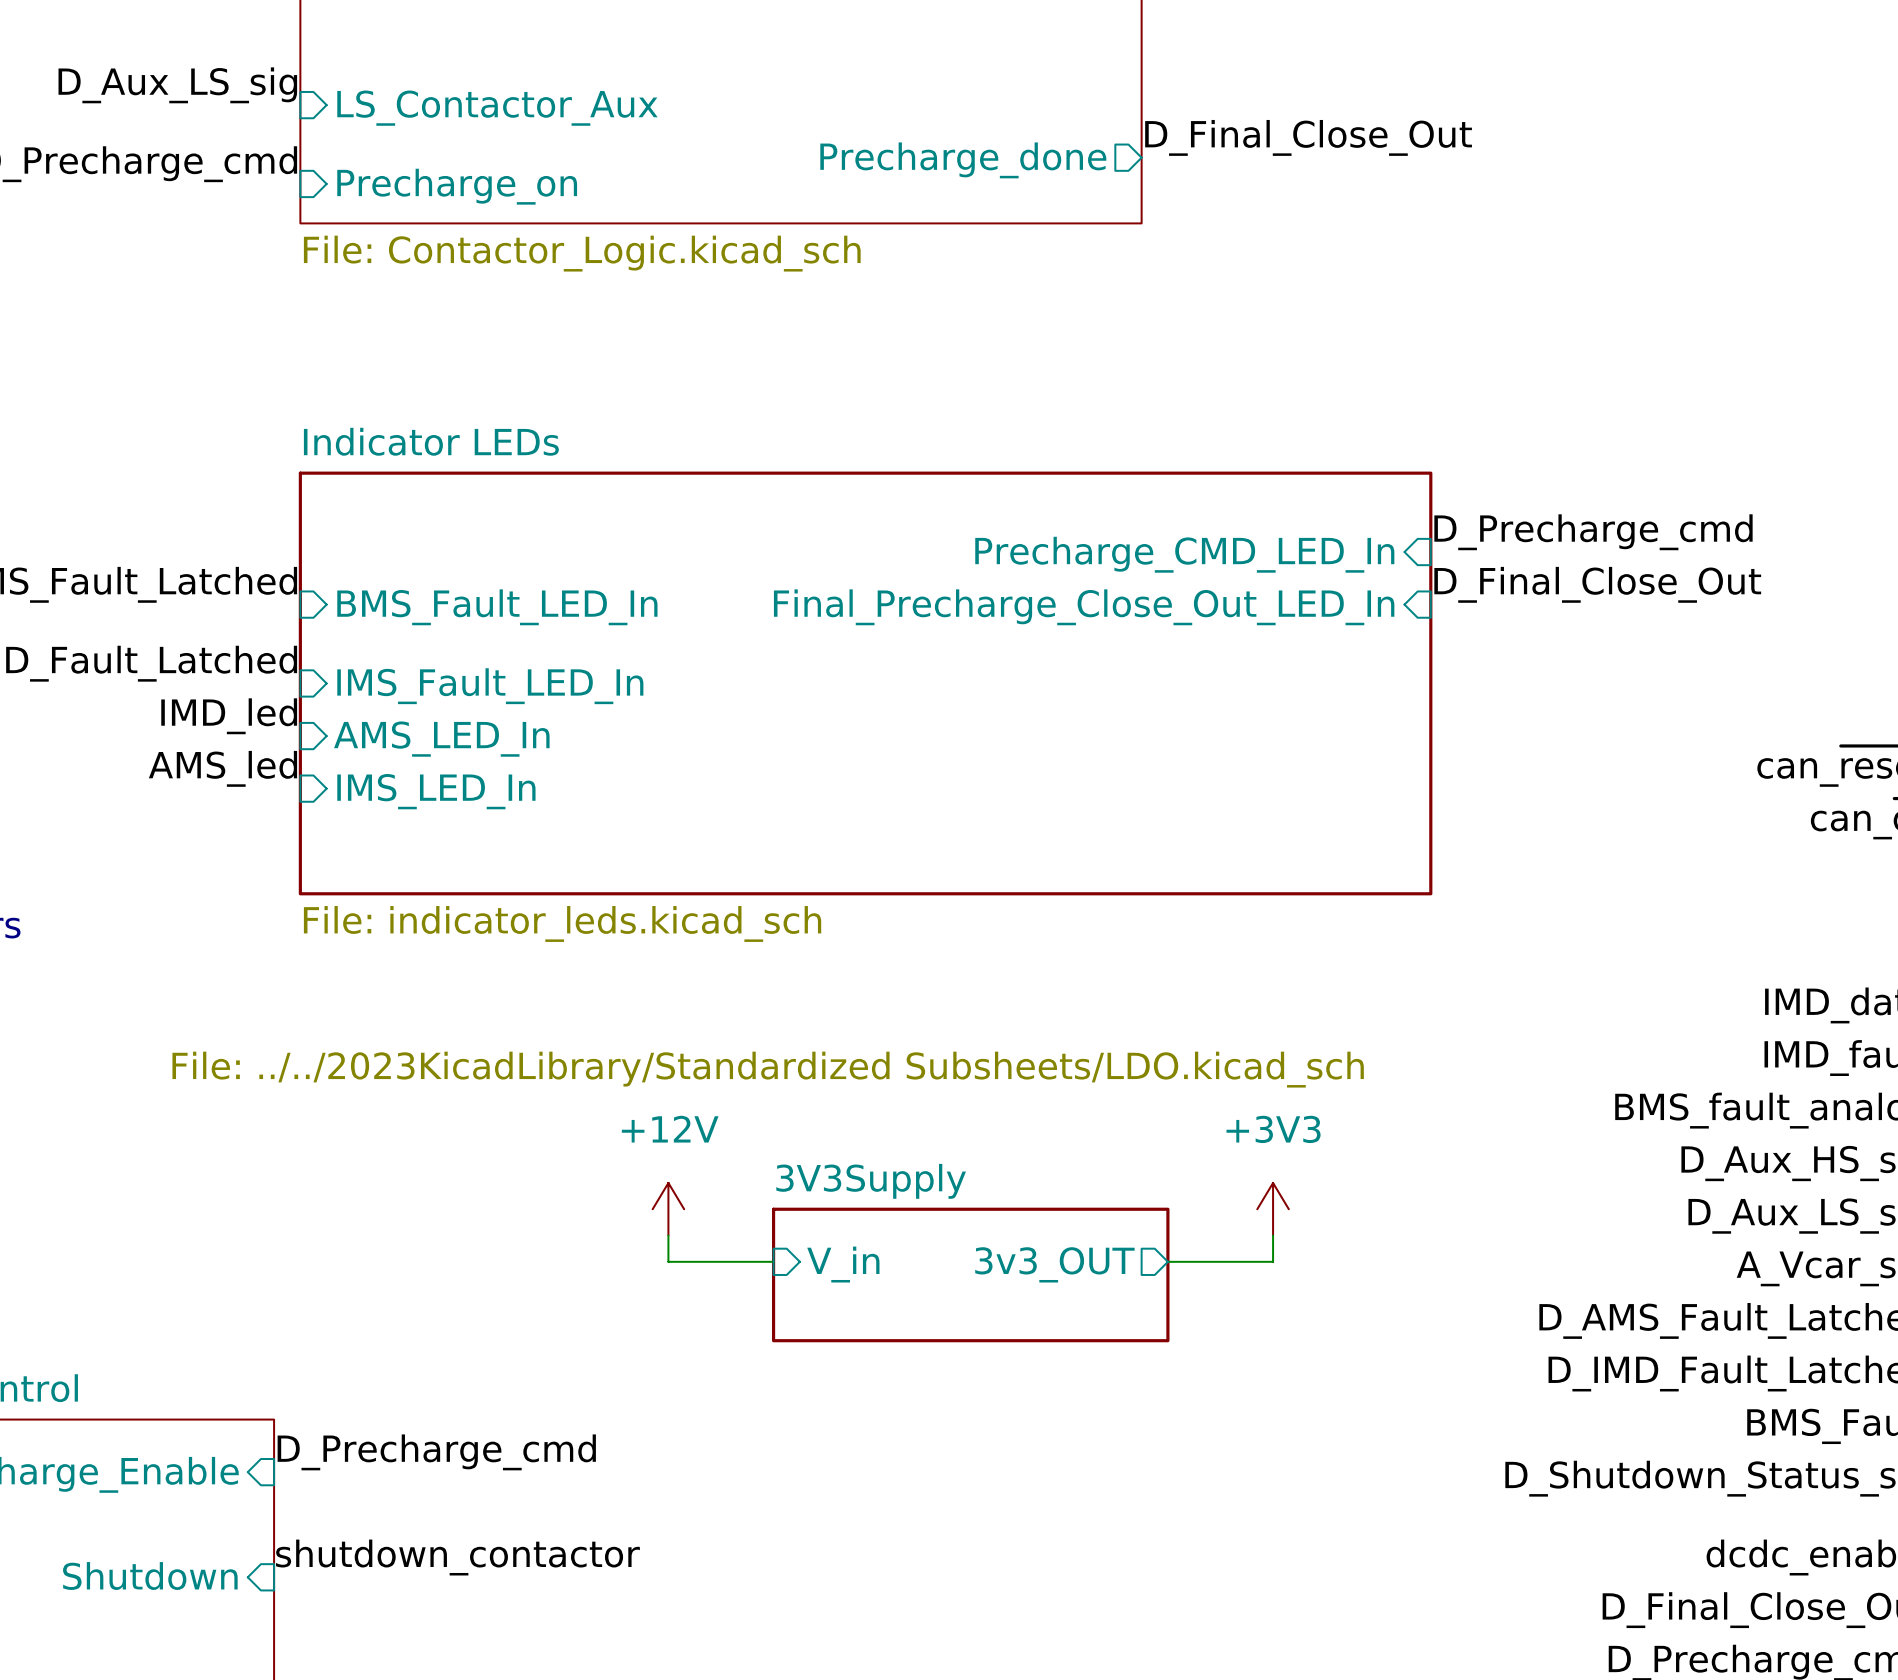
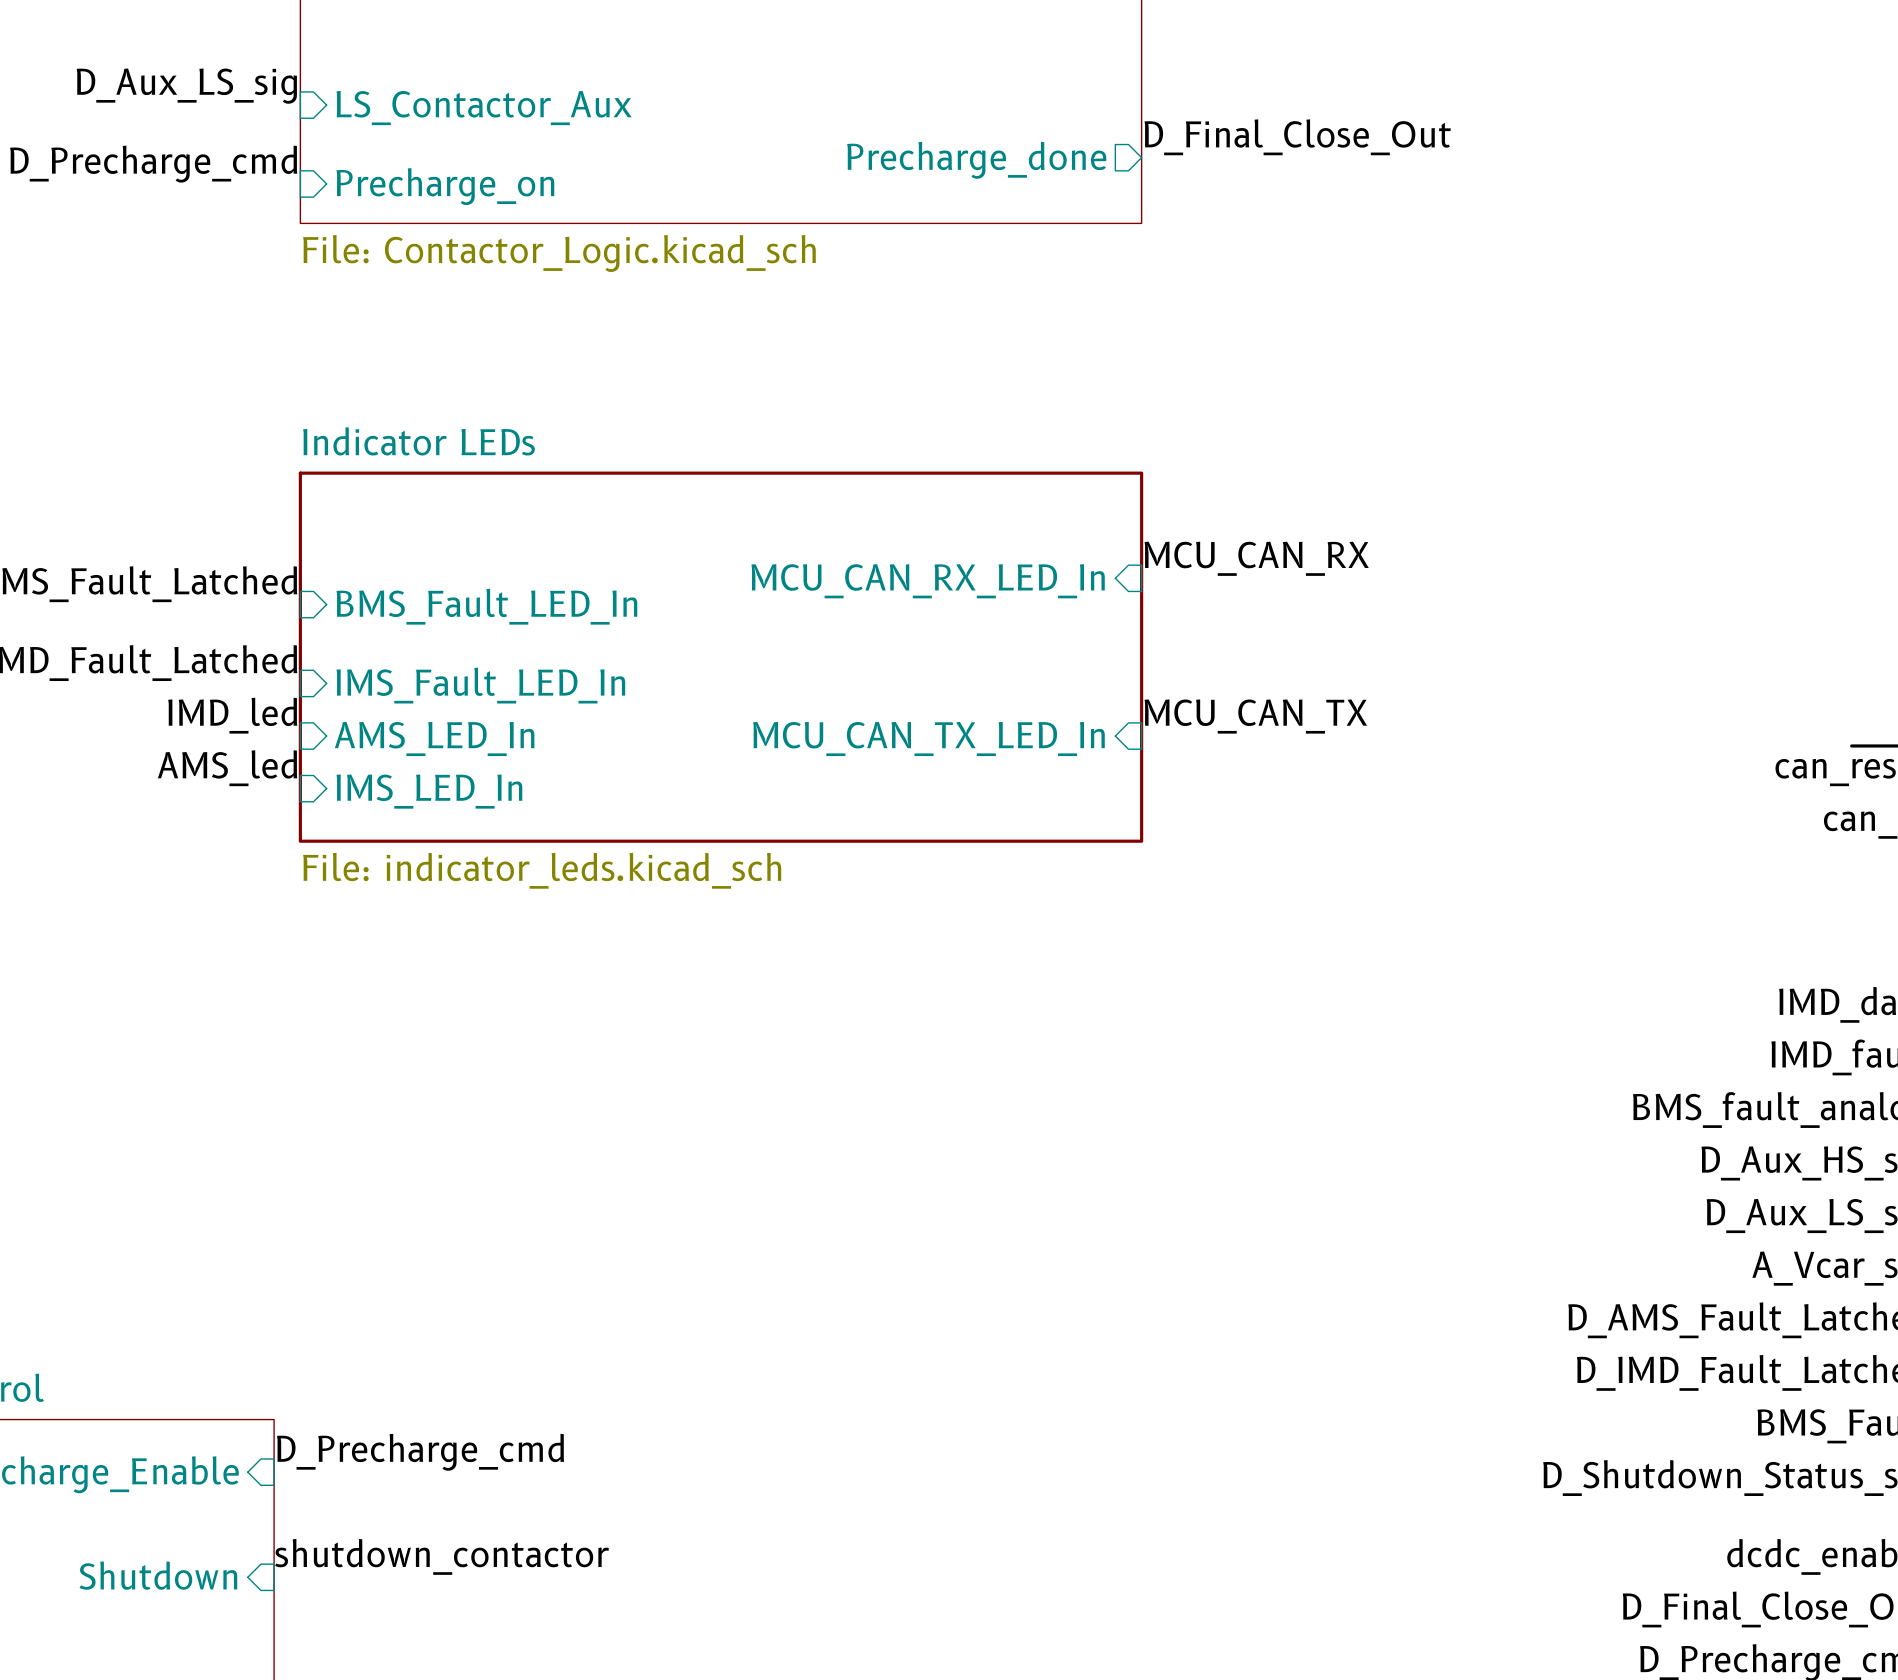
label: D_Precharge_cmd (1593, 532) -> none
sheet pin: Precharge_CMD_LED_In (1184, 554) -> none
label: none -> MCU_CAN_RX (1256, 558)
sheet pin: none -> MCU_CAN_RX_LED_In (928, 581)
label: D_Final_Close_Out (1597, 584) -> none
sheet pin: Final_Precharge_Close_Out_LED_In (1084, 607) -> none
sheet Indicator LEDs: none -> File: indicator_leds.kicad_sch (720, 657)
sheet Indicator LEDs: File: indicator_leds.kicad_sch (865, 683) -> none
label: none -> MCU_CAN_TX (1255, 716)
sheet pin: none -> MCU_CAN_TX_LED_In (928, 738)
power symbol: +12V (668, 1209) -> none
power symbol: +3V3 (1273, 1209) -> none
wire: (668, 1235) (668, 1261) (773, 1261) -> none
wire: (1273, 1235) (1273, 1261) (1167, 1261) -> none
sheet pin: V_in (843, 1264) -> none
sheet pin: 3v3_OUT (1054, 1264) -> none
sheet 3V3Supply: File: ../../2023KicadLibrary/Standardized Subsheets/LDO.kicad_sch (970, 1274) -> none

